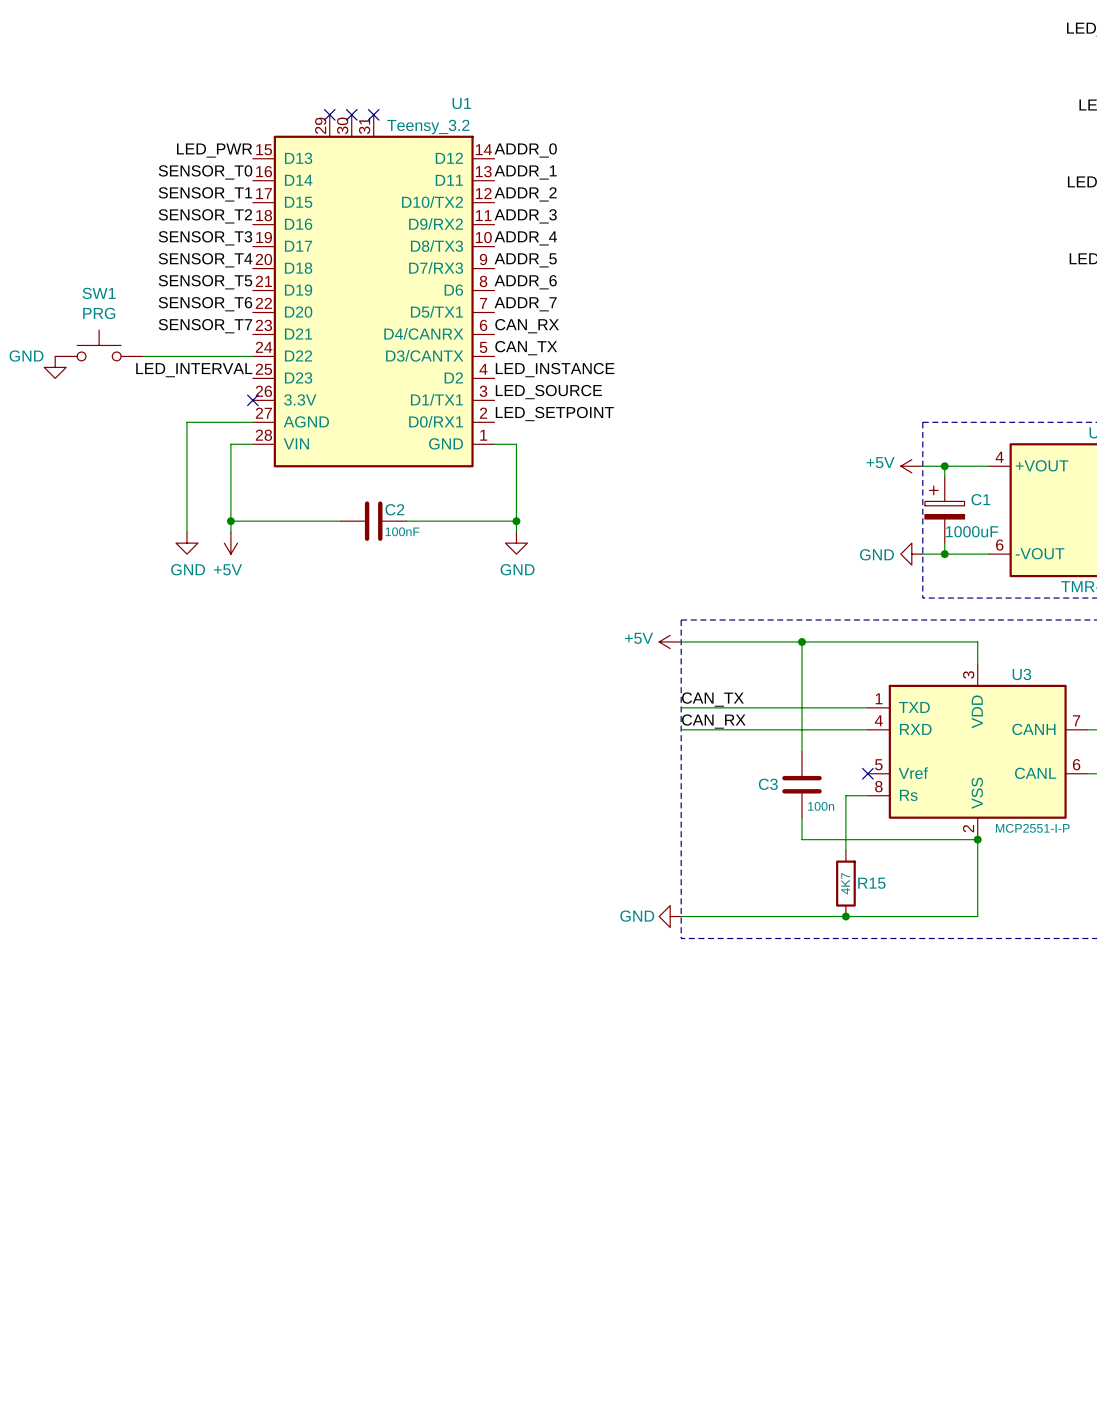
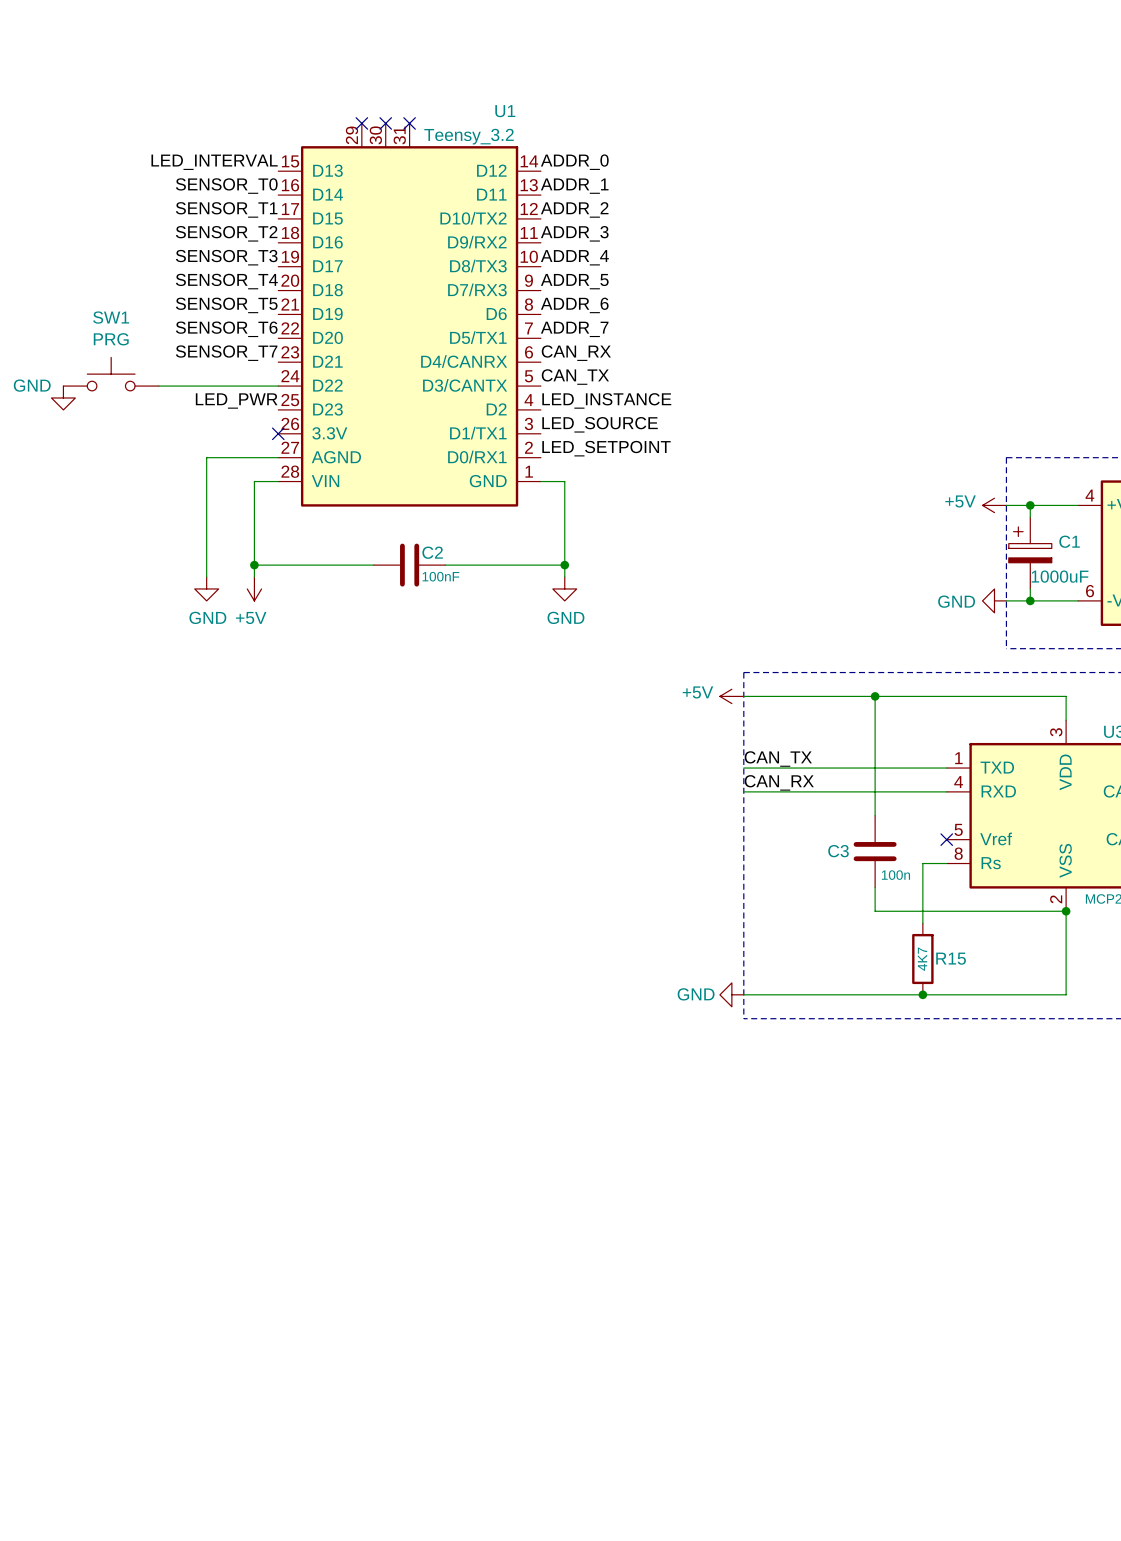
label: LED_PWR (214, 150) -> LED_INTERVAL (214, 162)
label: LED_INTERVAL (194, 370) -> LED_PWR (236, 401)

